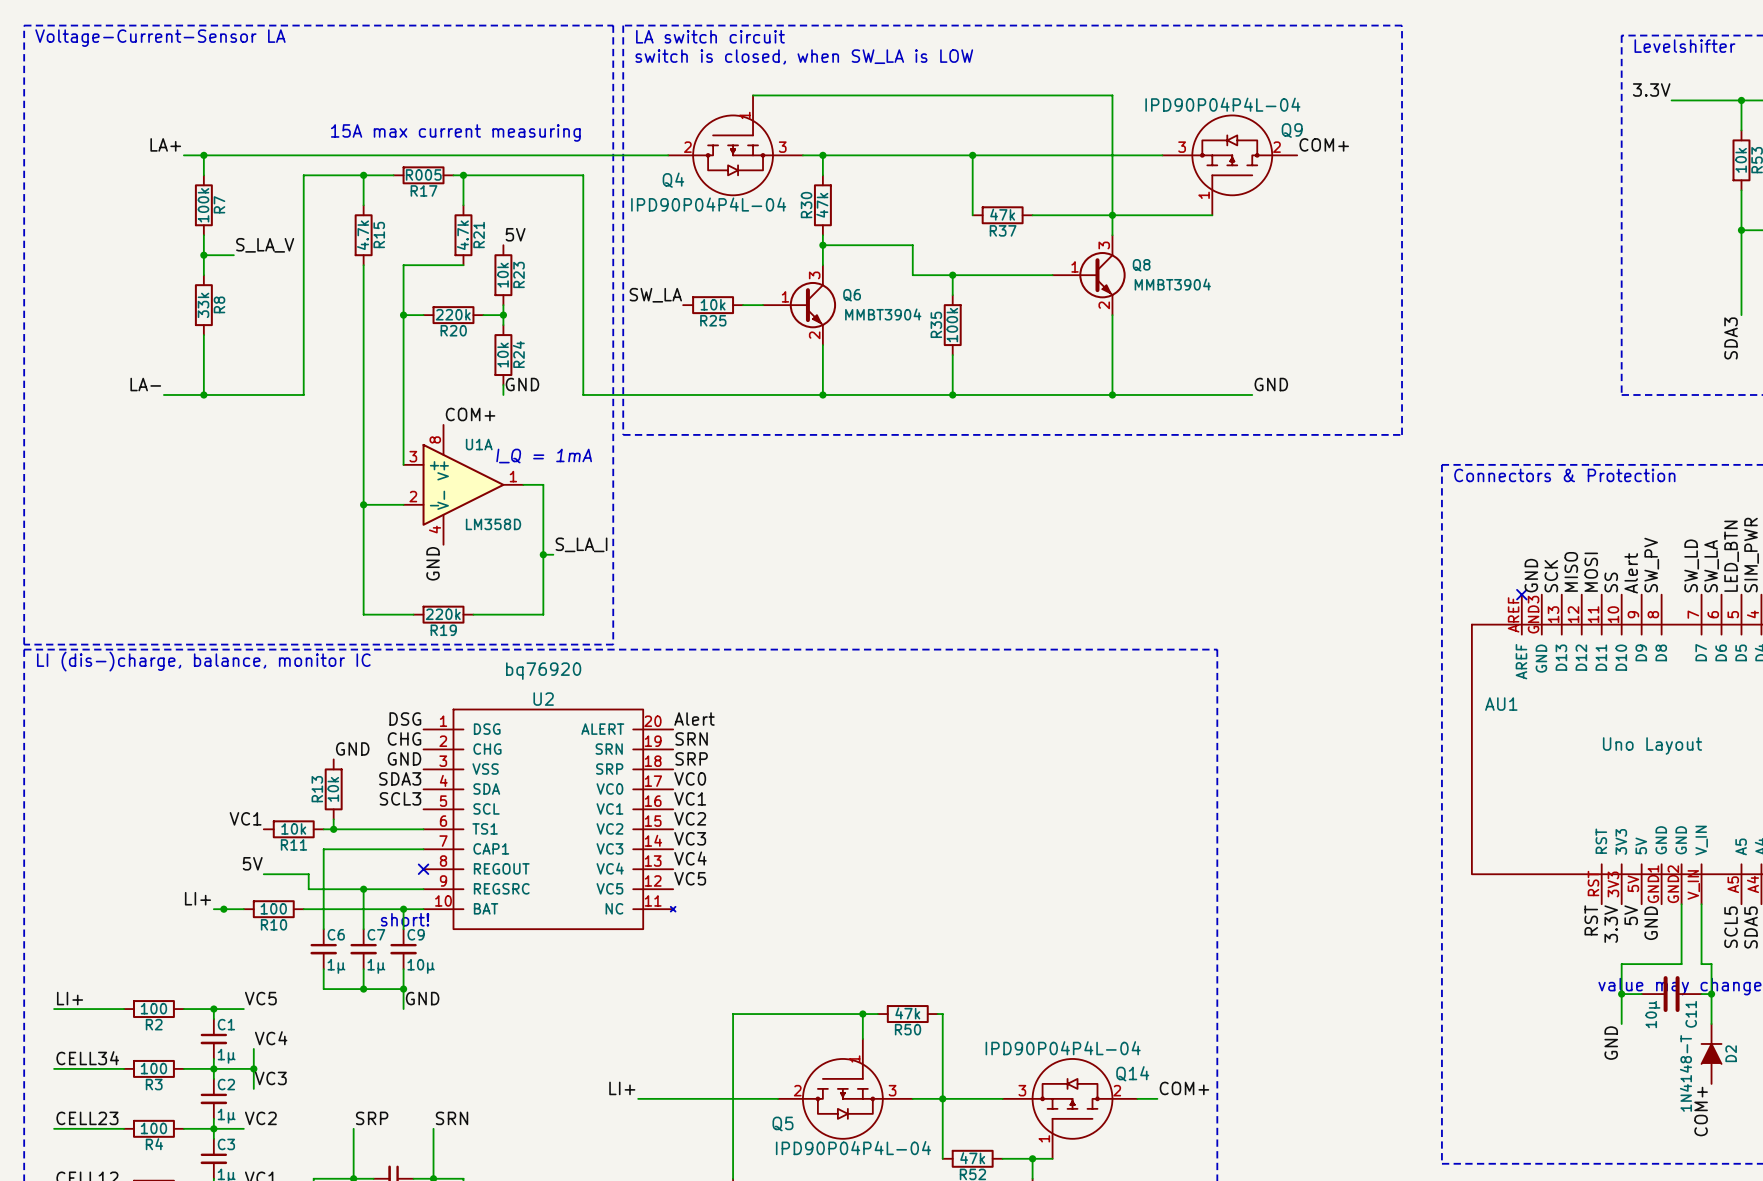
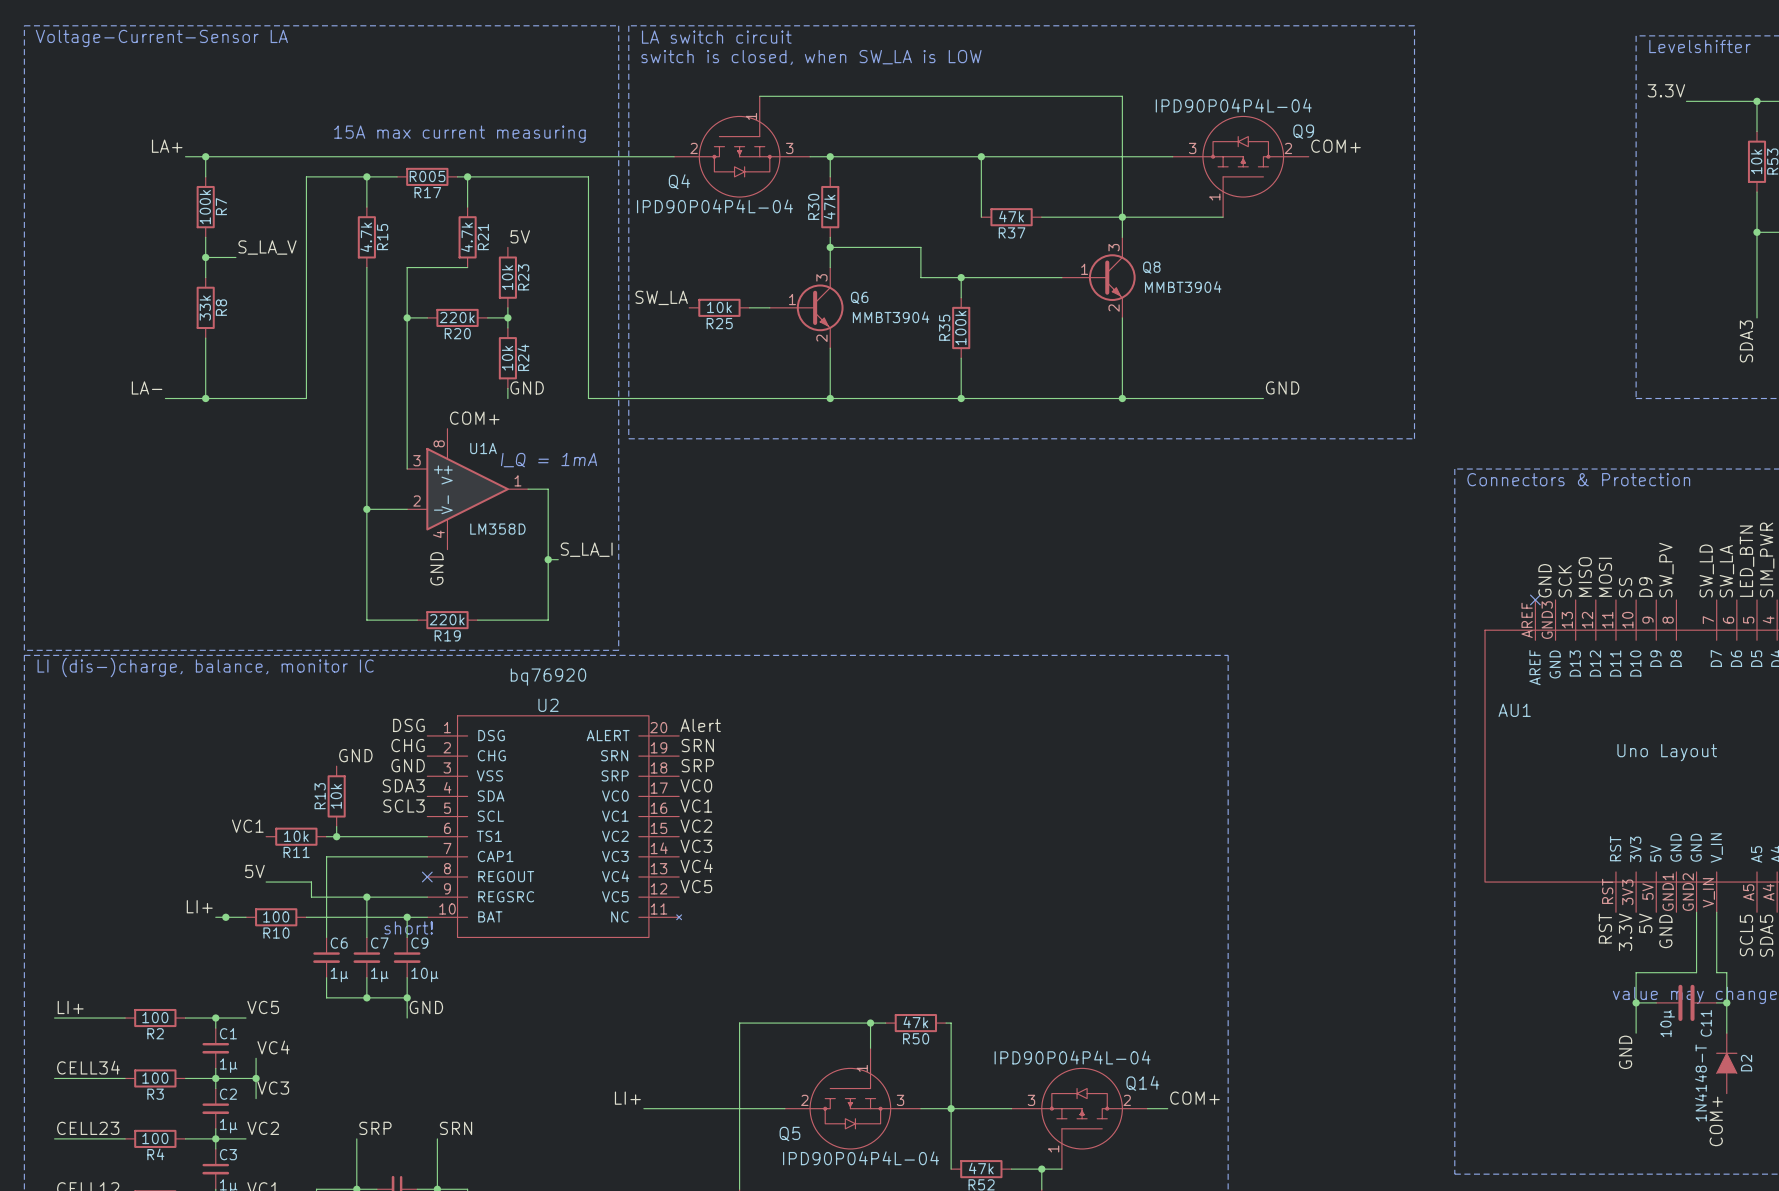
label: Alert (1631, 573) -> D9 (1645, 587)

